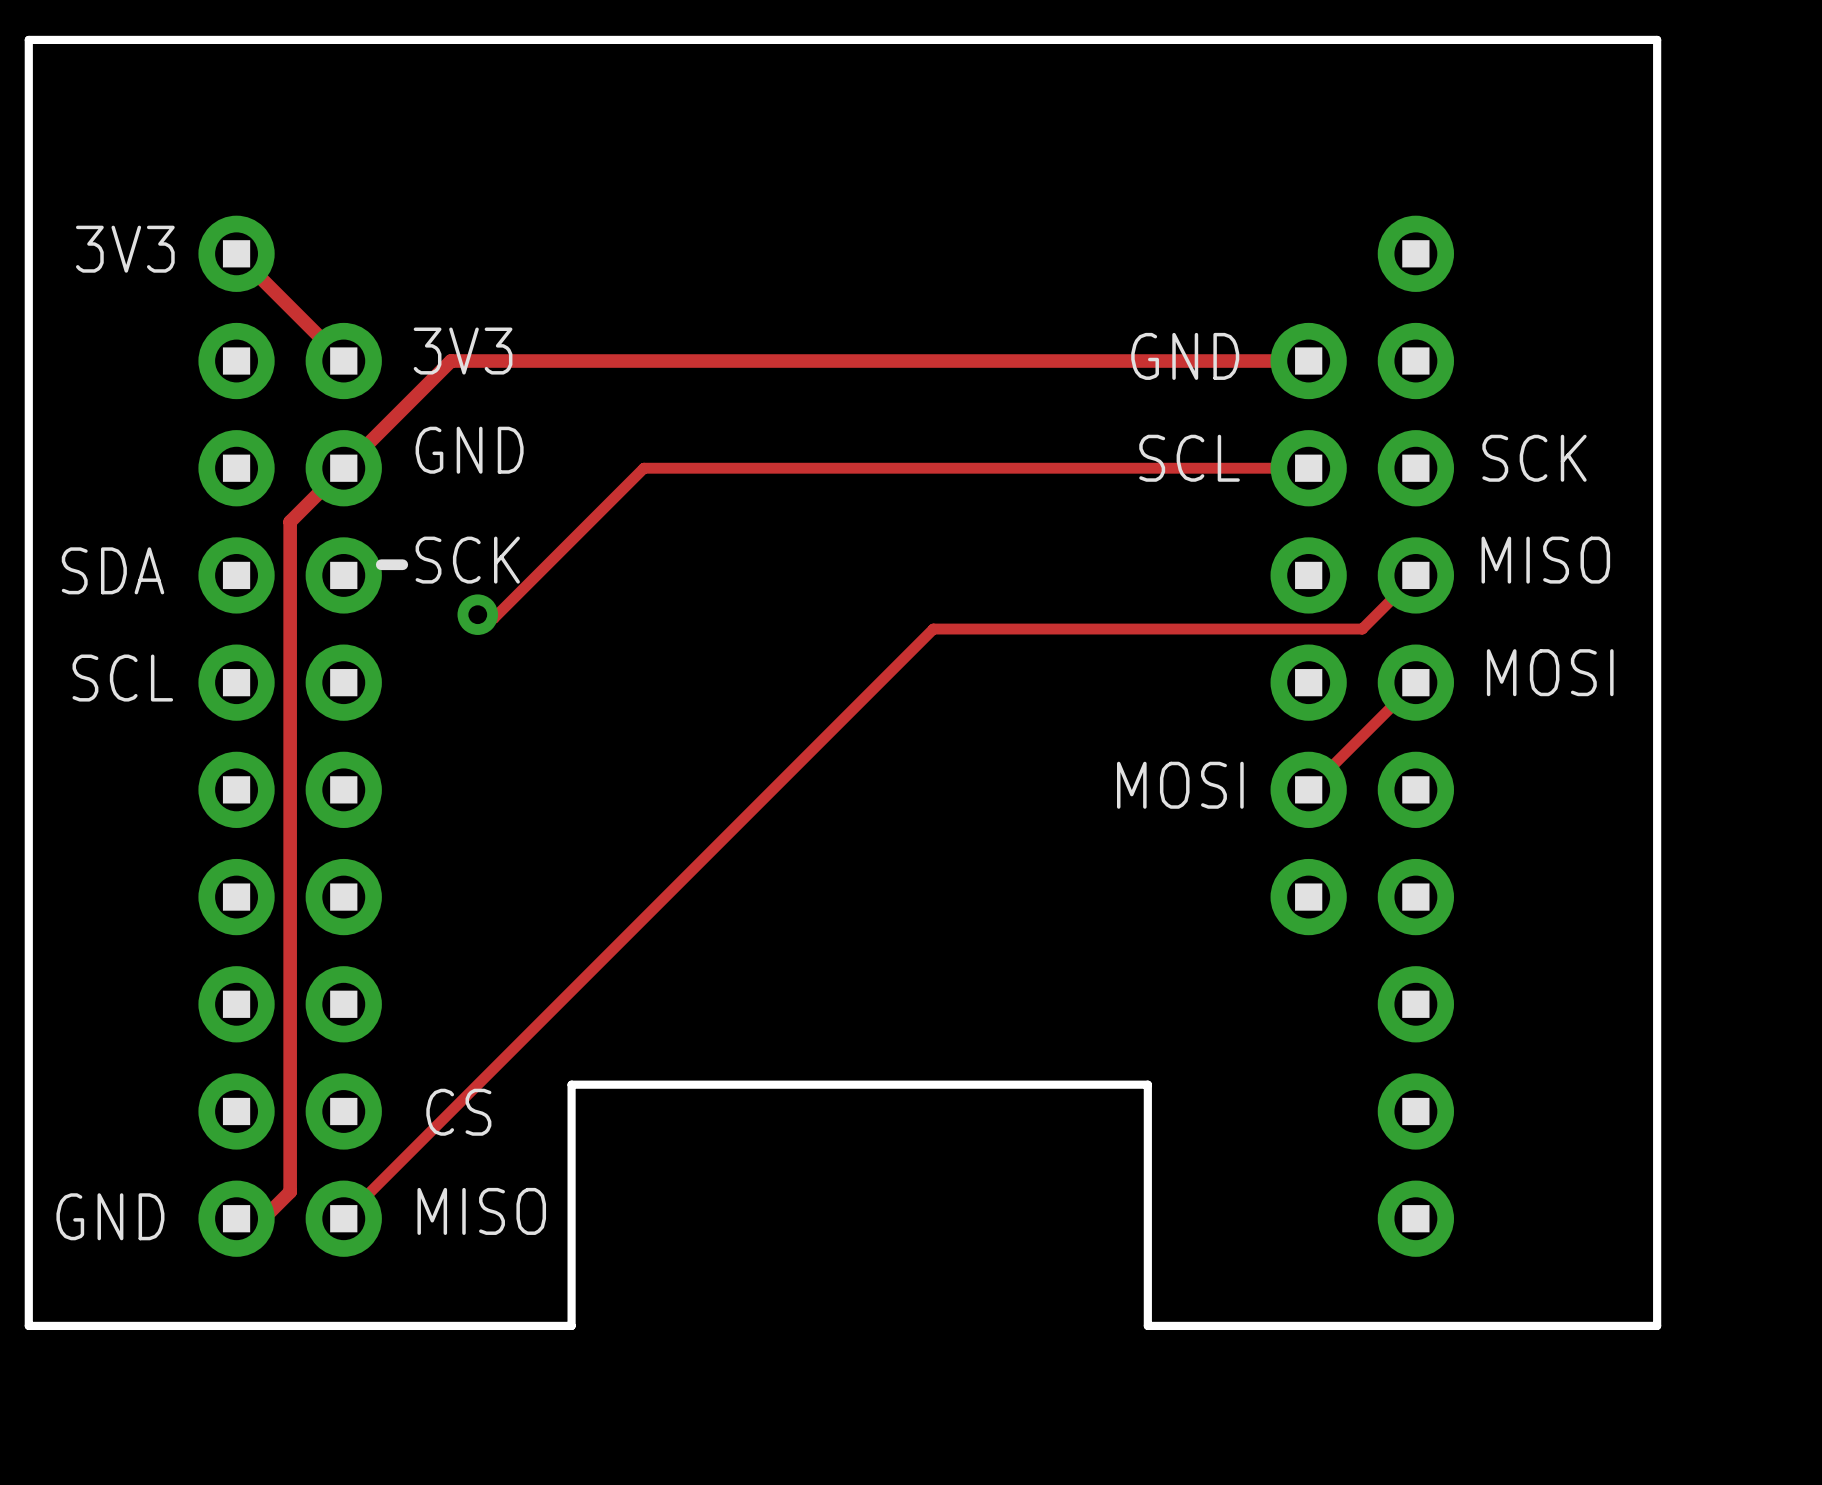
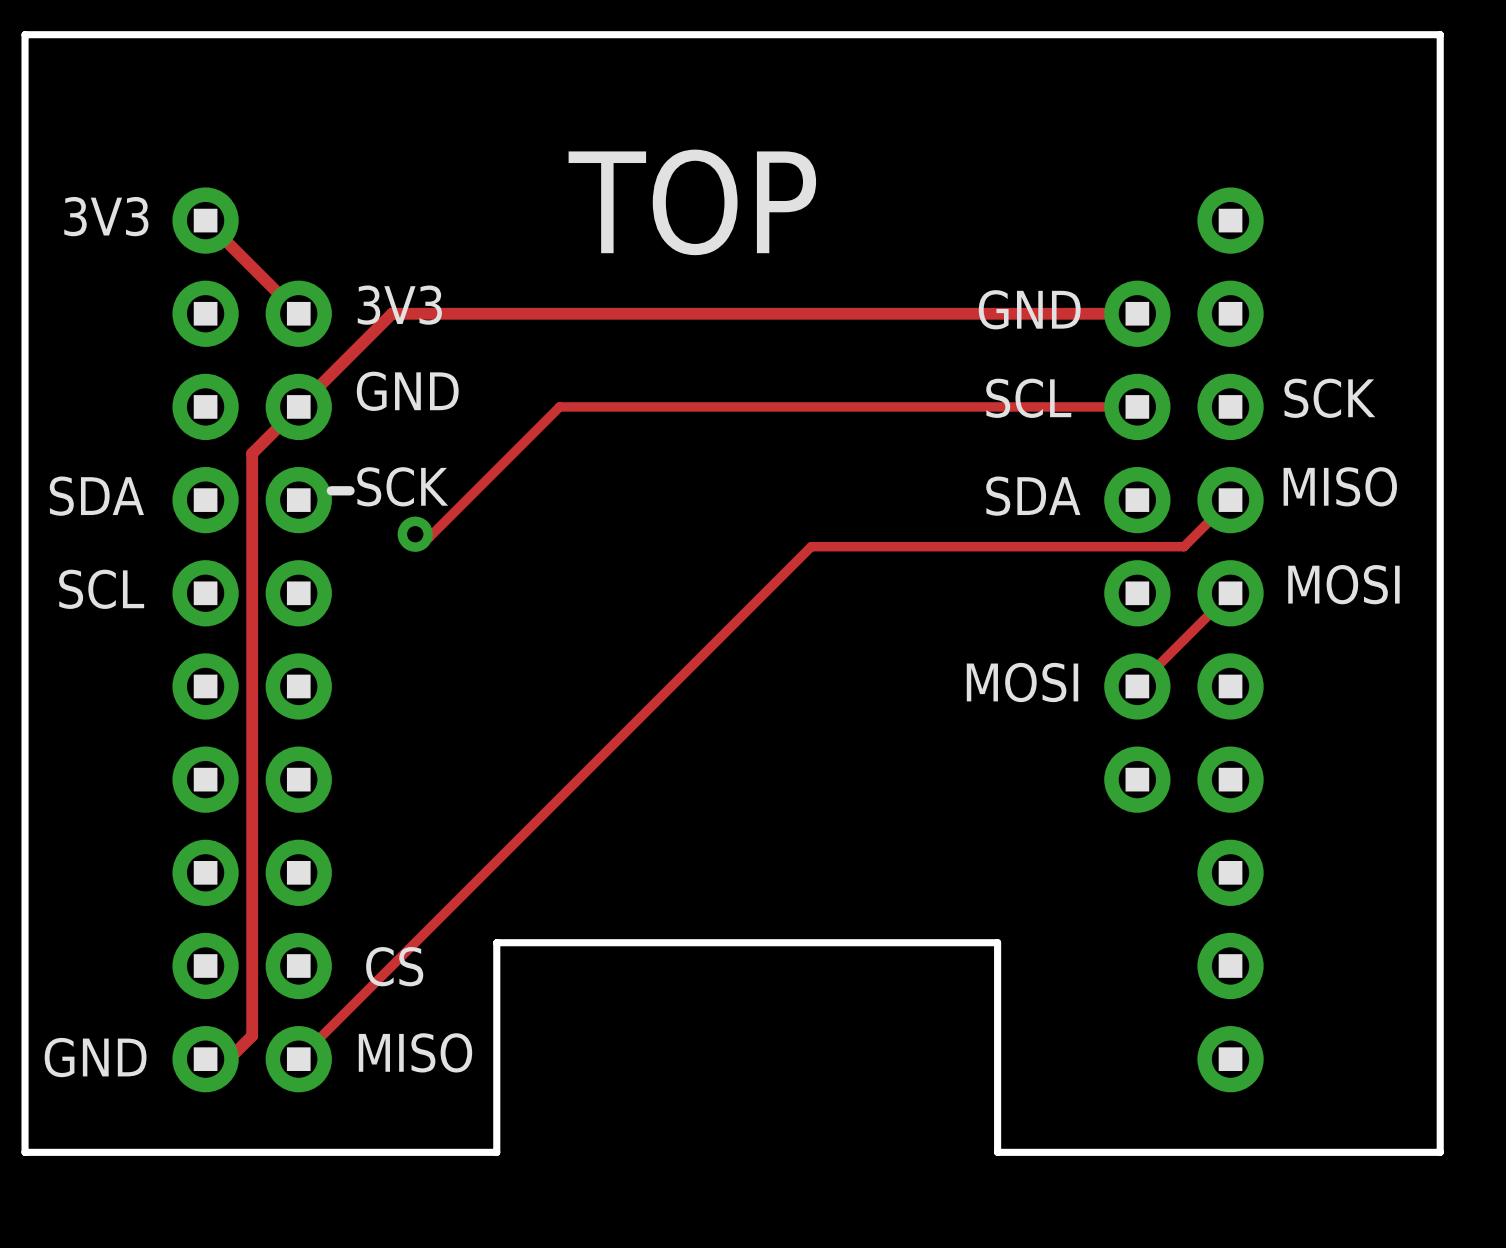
text: none -> TOP (692, 202)
text: none -> SDA (1033, 496)

